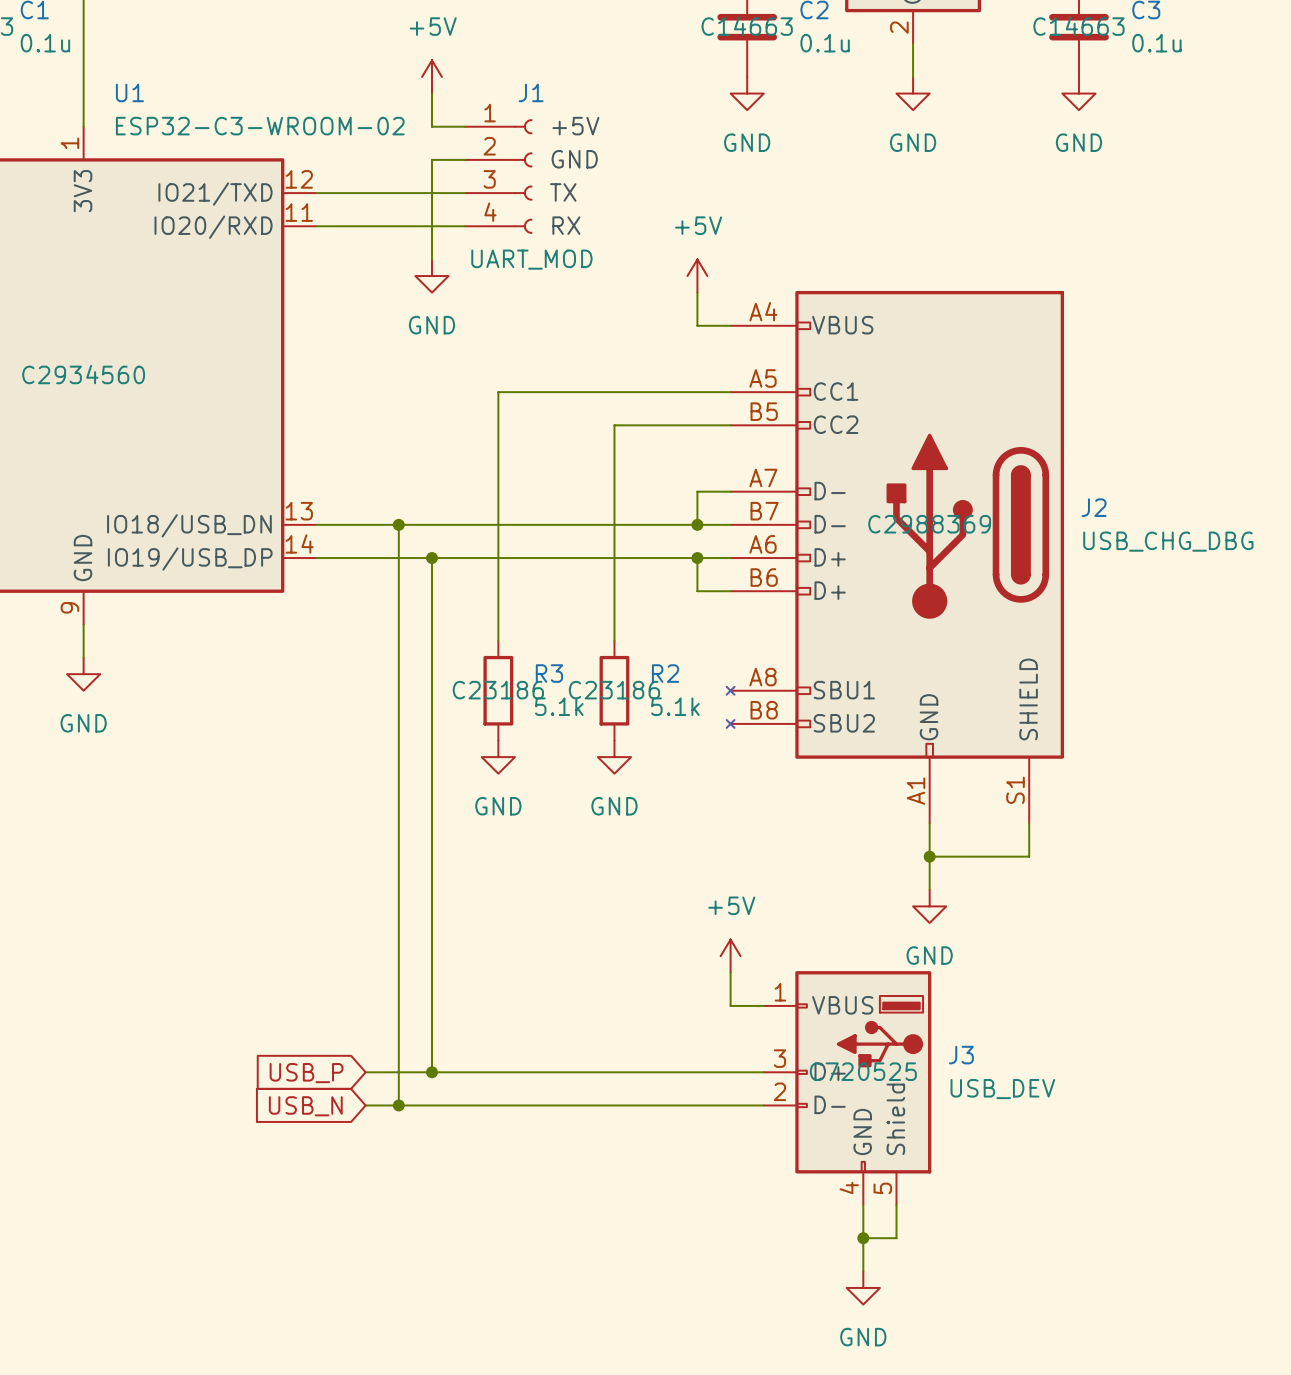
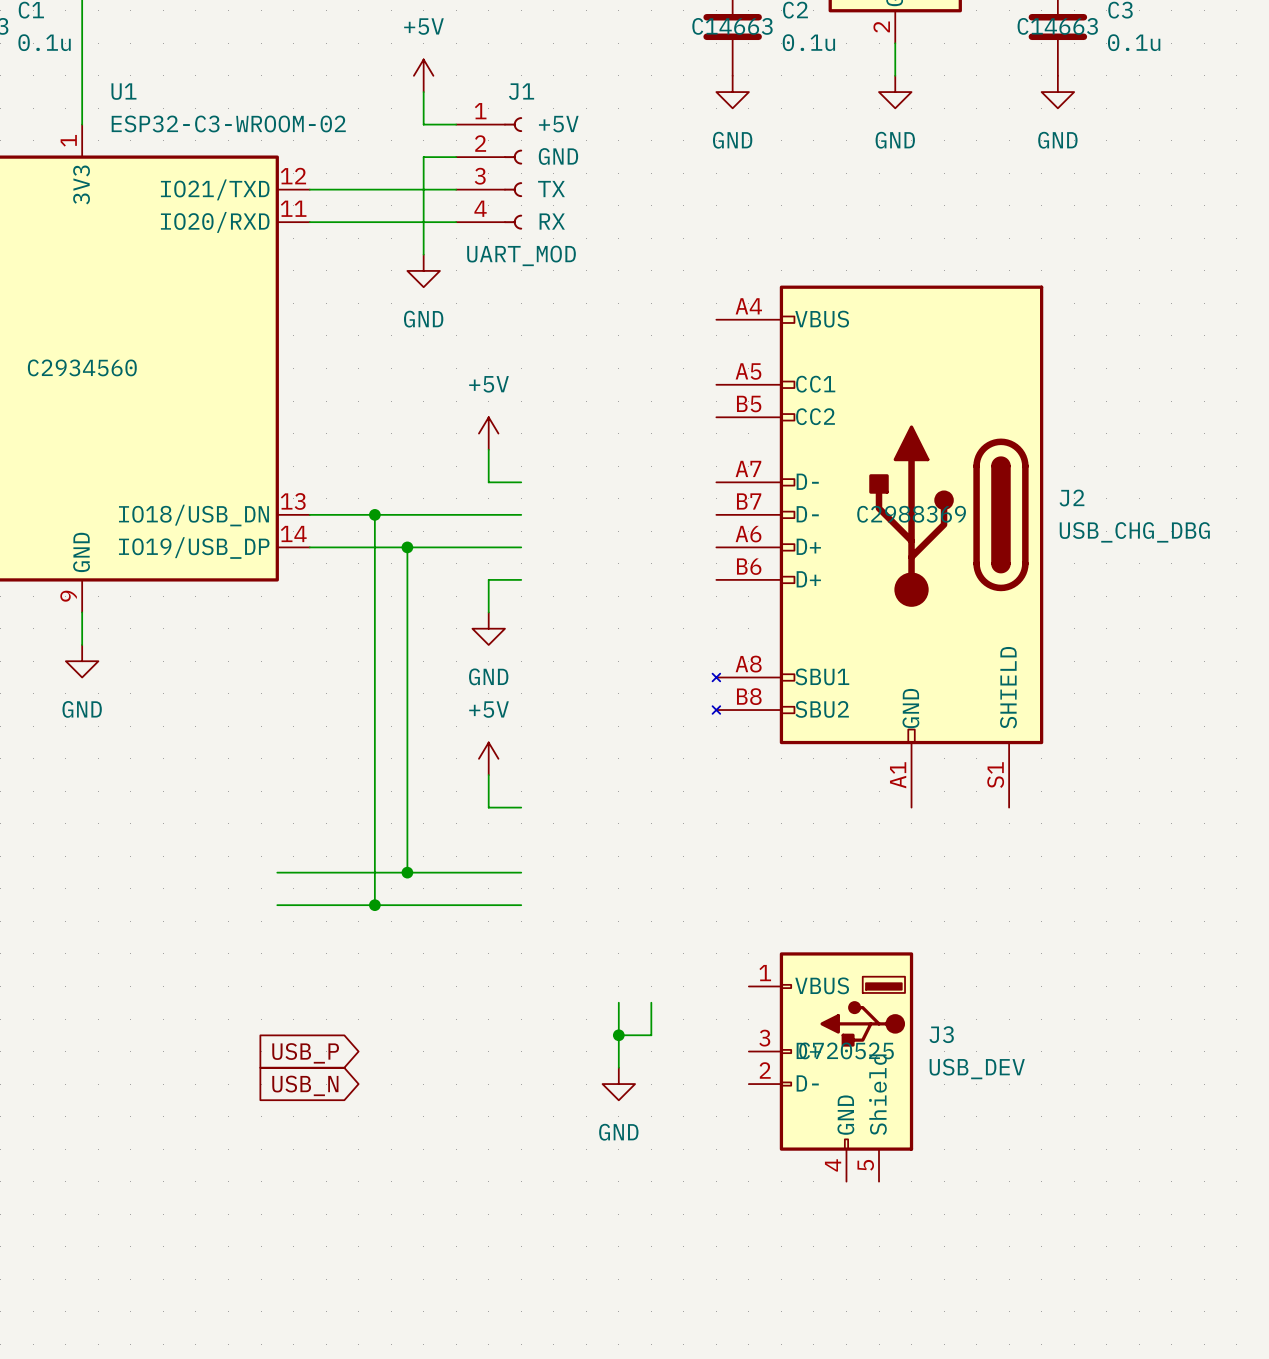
power symbol position: +5V (697, 276) -> +5V (488, 433)
wire: (697, 292) (697, 325) (730, 325) -> none
wire: (730, 392) (498, 392) (498, 458) -> none
wire: (730, 425) (614, 425) (614, 640) -> none
wire: (498, 491) (498, 591) -> (488, 482) (521, 482)
wire: (730, 491) (697, 491) (697, 524) -> none
wire: none -> (374, 514) (374, 905)
wire: (398, 524) (398, 1105) -> none
junction position: (398, 524) -> (374, 514)
wire: (531, 524) (730, 524) -> none
junction: (697, 524) -> none
wire: none -> (407, 547) (407, 872)
wire: (432, 558) (432, 1072) -> none
junction position: (432, 558) -> (407, 547)
wire: (531, 558) (730, 558) -> none
wire: (697, 558) (697, 591) (730, 591) -> none
junction: (697, 558) -> none
wire: none -> (488, 579) (521, 579)
power symbol: none -> GND (488, 628)
R3: 5.1k (498, 690) -> none
R2: 5.1k (614, 690) -> none
power symbol: GND (498, 757) -> none
power symbol: GND (614, 757) -> none
power symbol: none -> +5V (488, 758)
wire: (929, 823) (929, 889) -> none
wire: (1029, 823) (1029, 856) (929, 856) -> none
junction: (929, 856) -> none
wire: none -> (277, 872) (521, 872)
junction: none -> (407, 872)
power symbol: GND (929, 906) -> none
wire: none -> (277, 905) (521, 905)
junction: none -> (374, 905)
power symbol: +5V (730, 956) -> none
wire: (730, 972) (730, 1005) (763, 1005) -> (488, 775) (488, 807) (521, 807)
junction: none -> (618, 1035)
wire: (365, 1072) (763, 1072) -> none
junction: (432, 1072) -> none
wire: (365, 1105) (763, 1105) -> none
junction: (398, 1105) -> none
power symbol: none -> GND (618, 1084)
wire: (863, 1205) (863, 1271) -> (618, 1002) (618, 1067)
wire: (896, 1205) (896, 1238) (863, 1238) -> (651, 1002) (651, 1035) (618, 1035)
junction: (863, 1238) -> none
power symbol: GND (863, 1287) -> none

